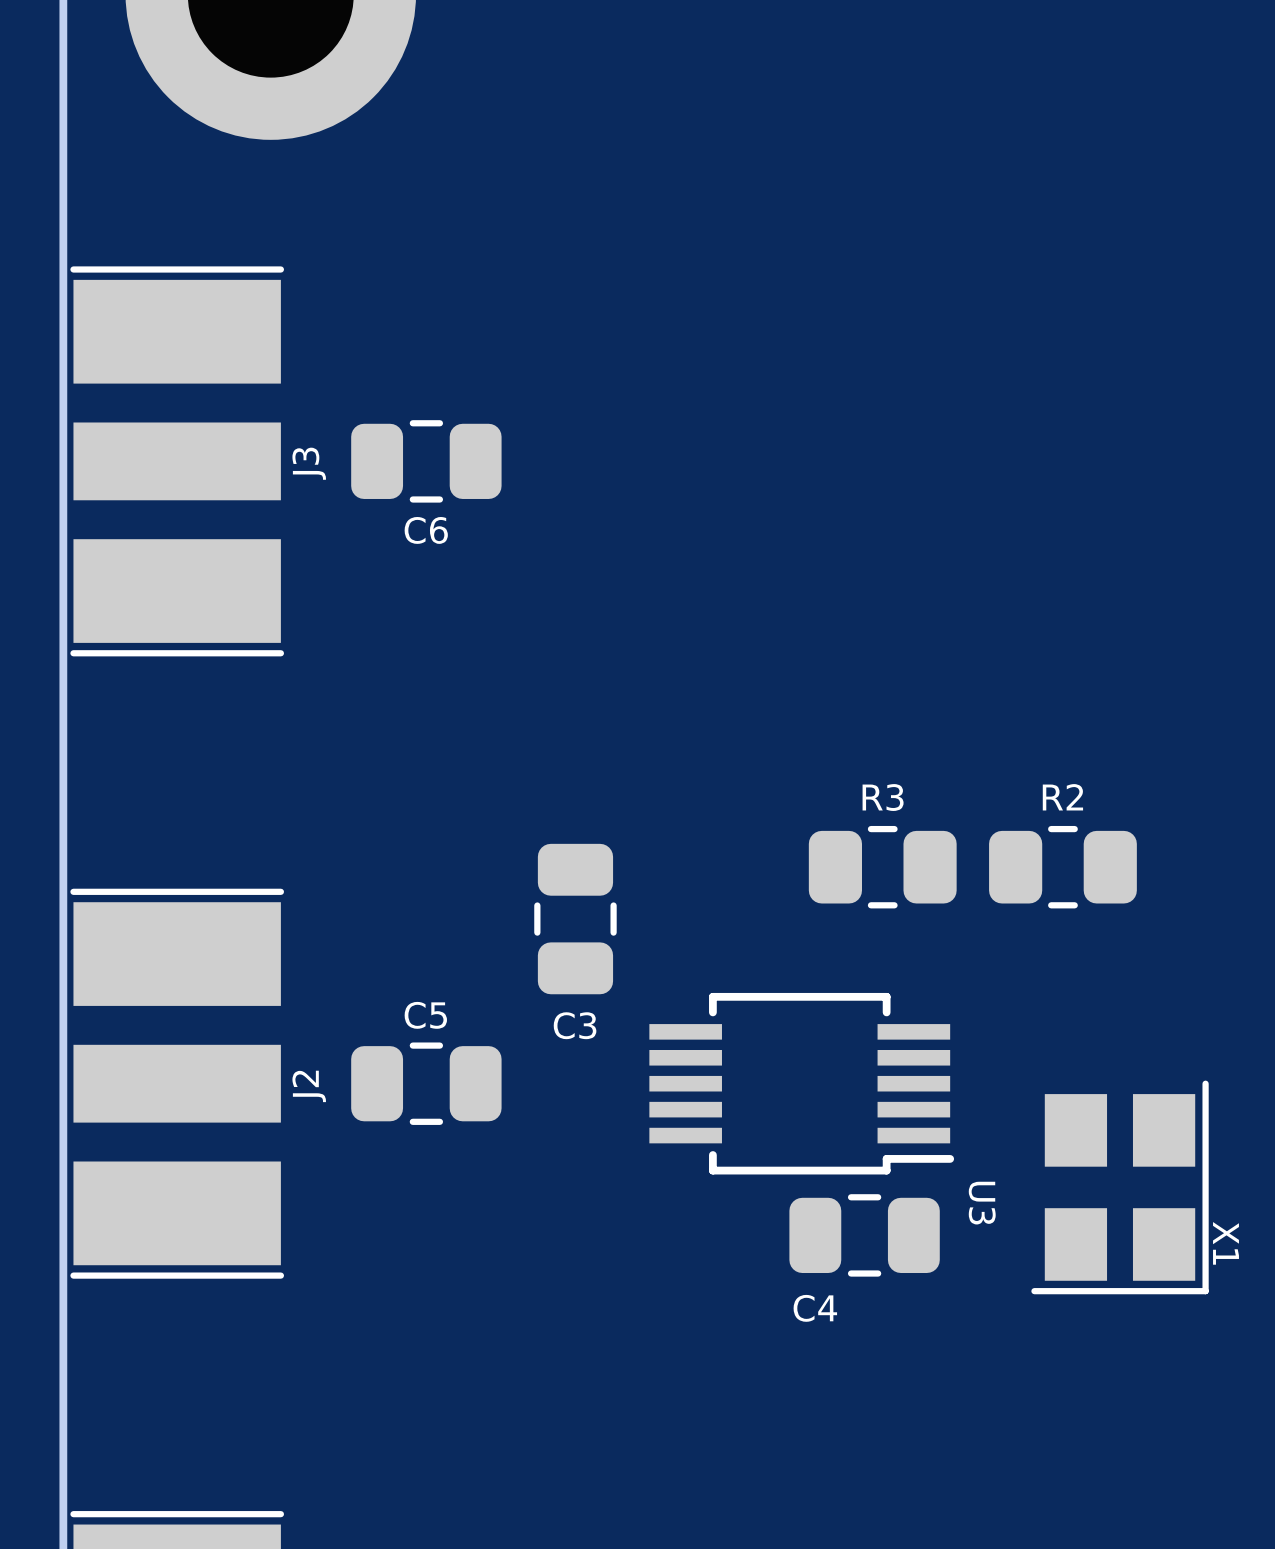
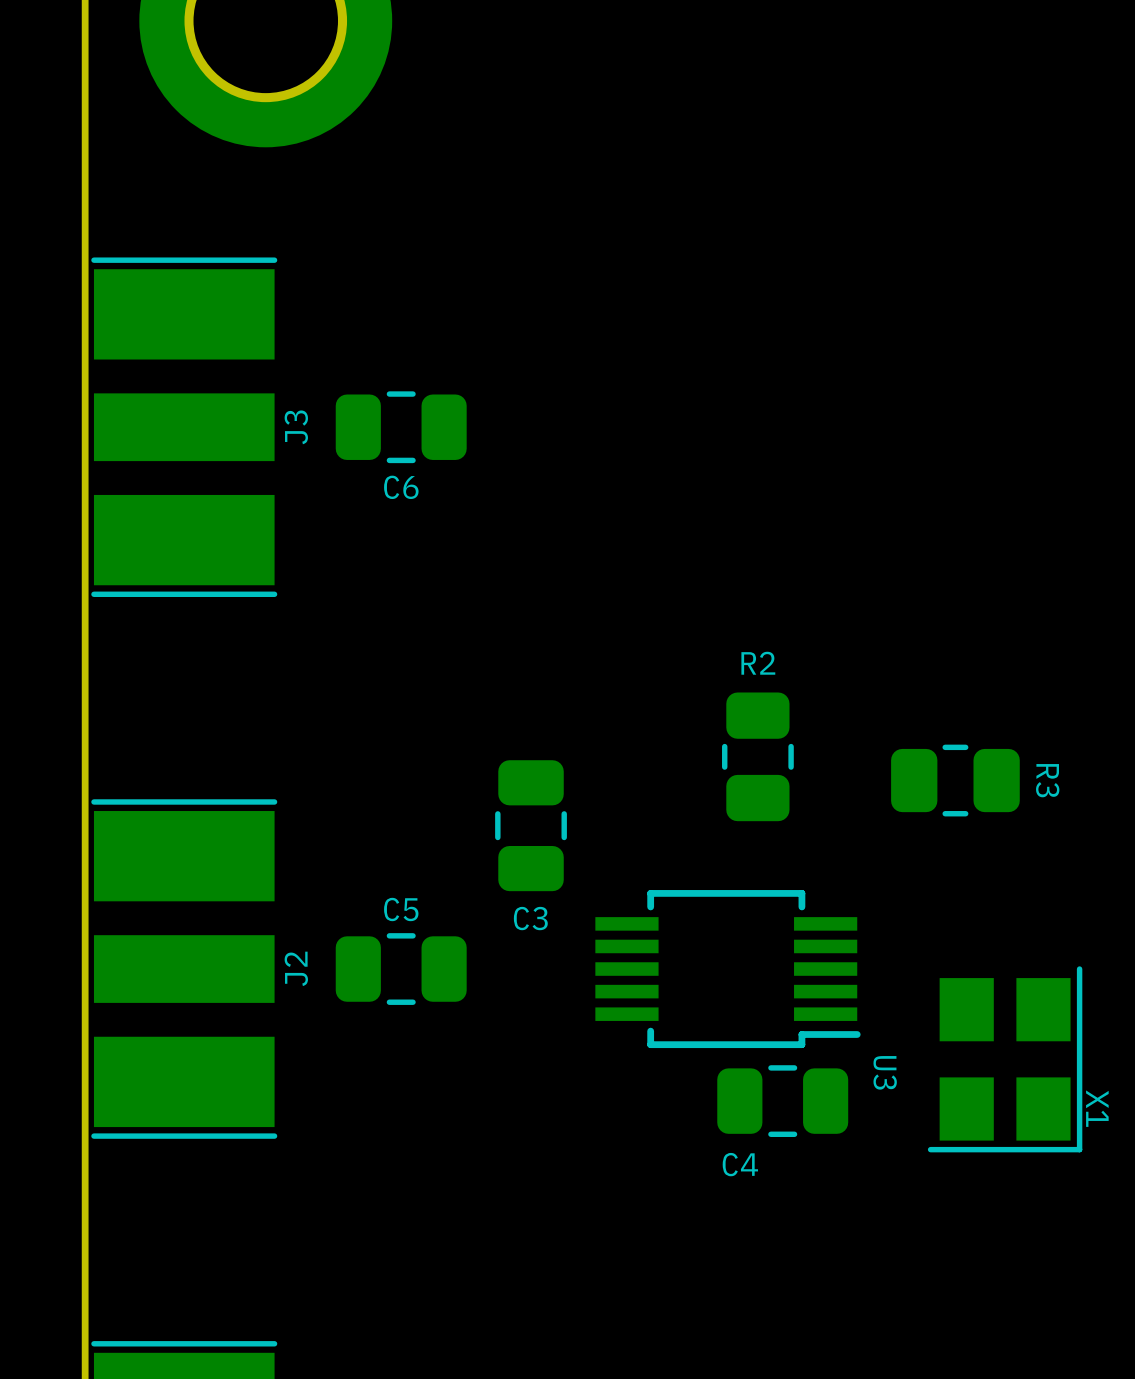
R2 name: R2 (1062, 797) -> R3 (1047, 780)
R2: none -> (757, 756)
R3: (882, 867) -> none

